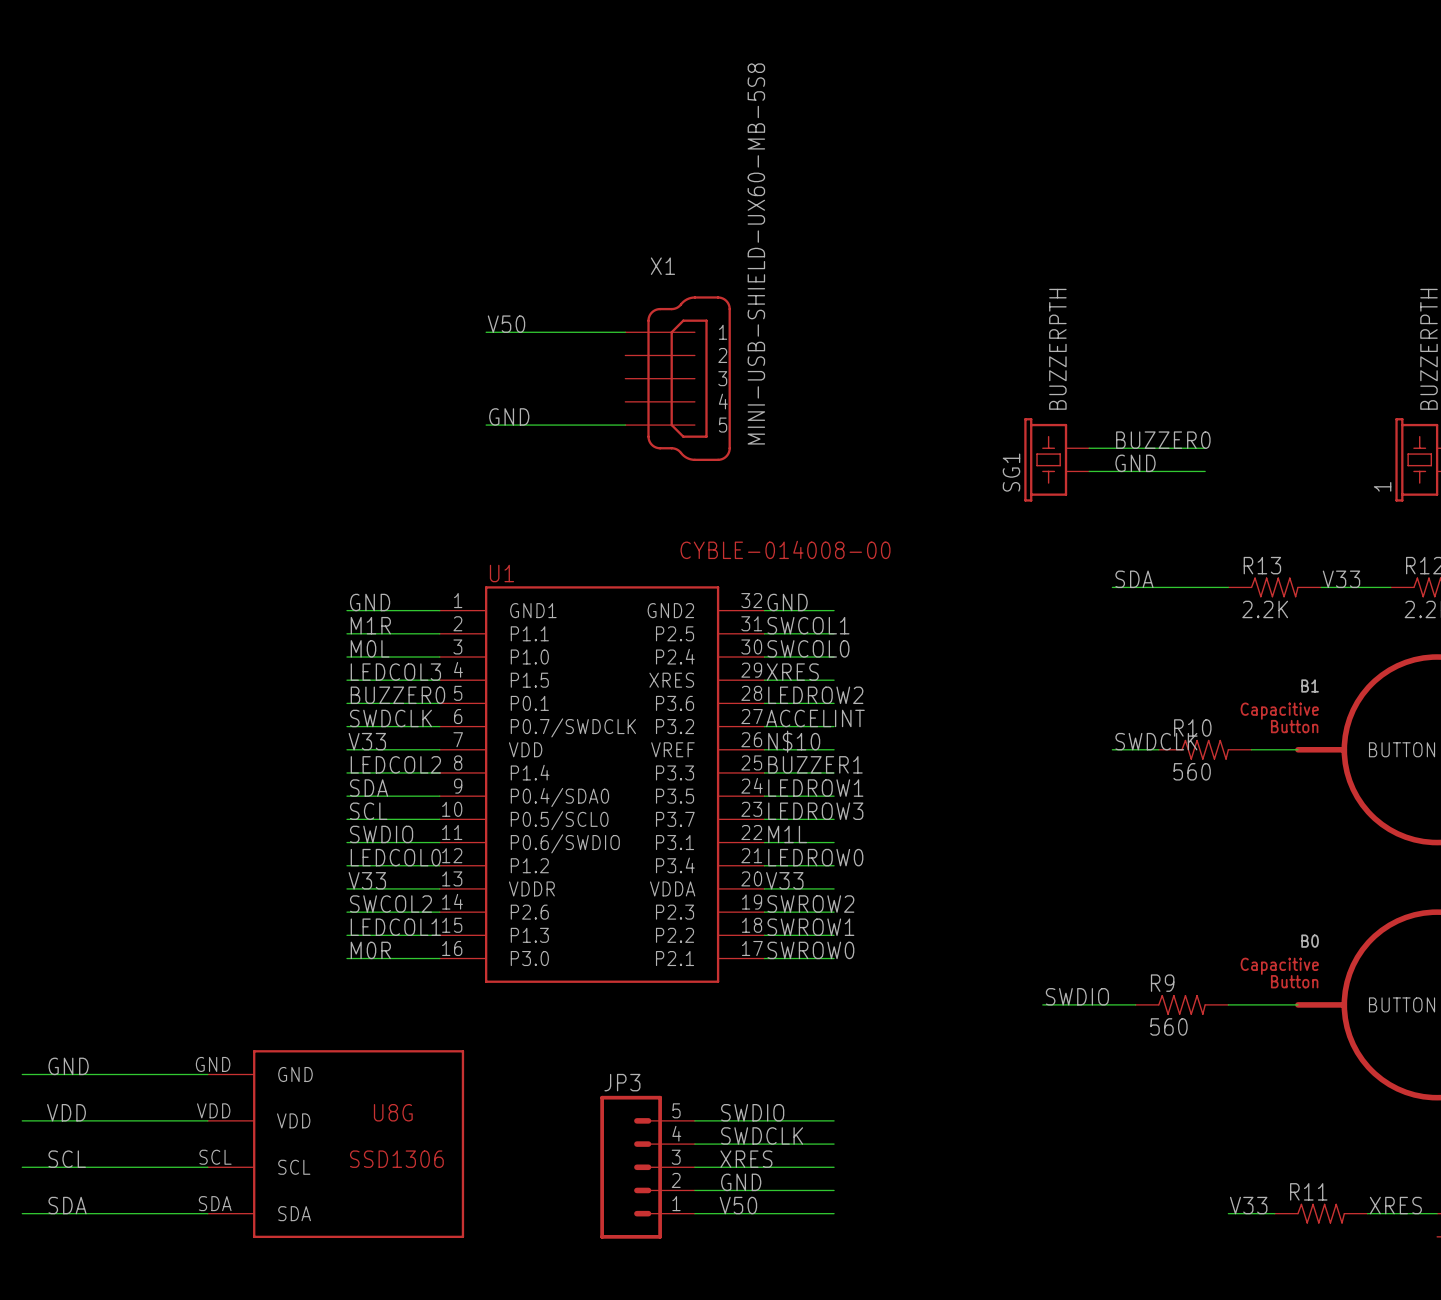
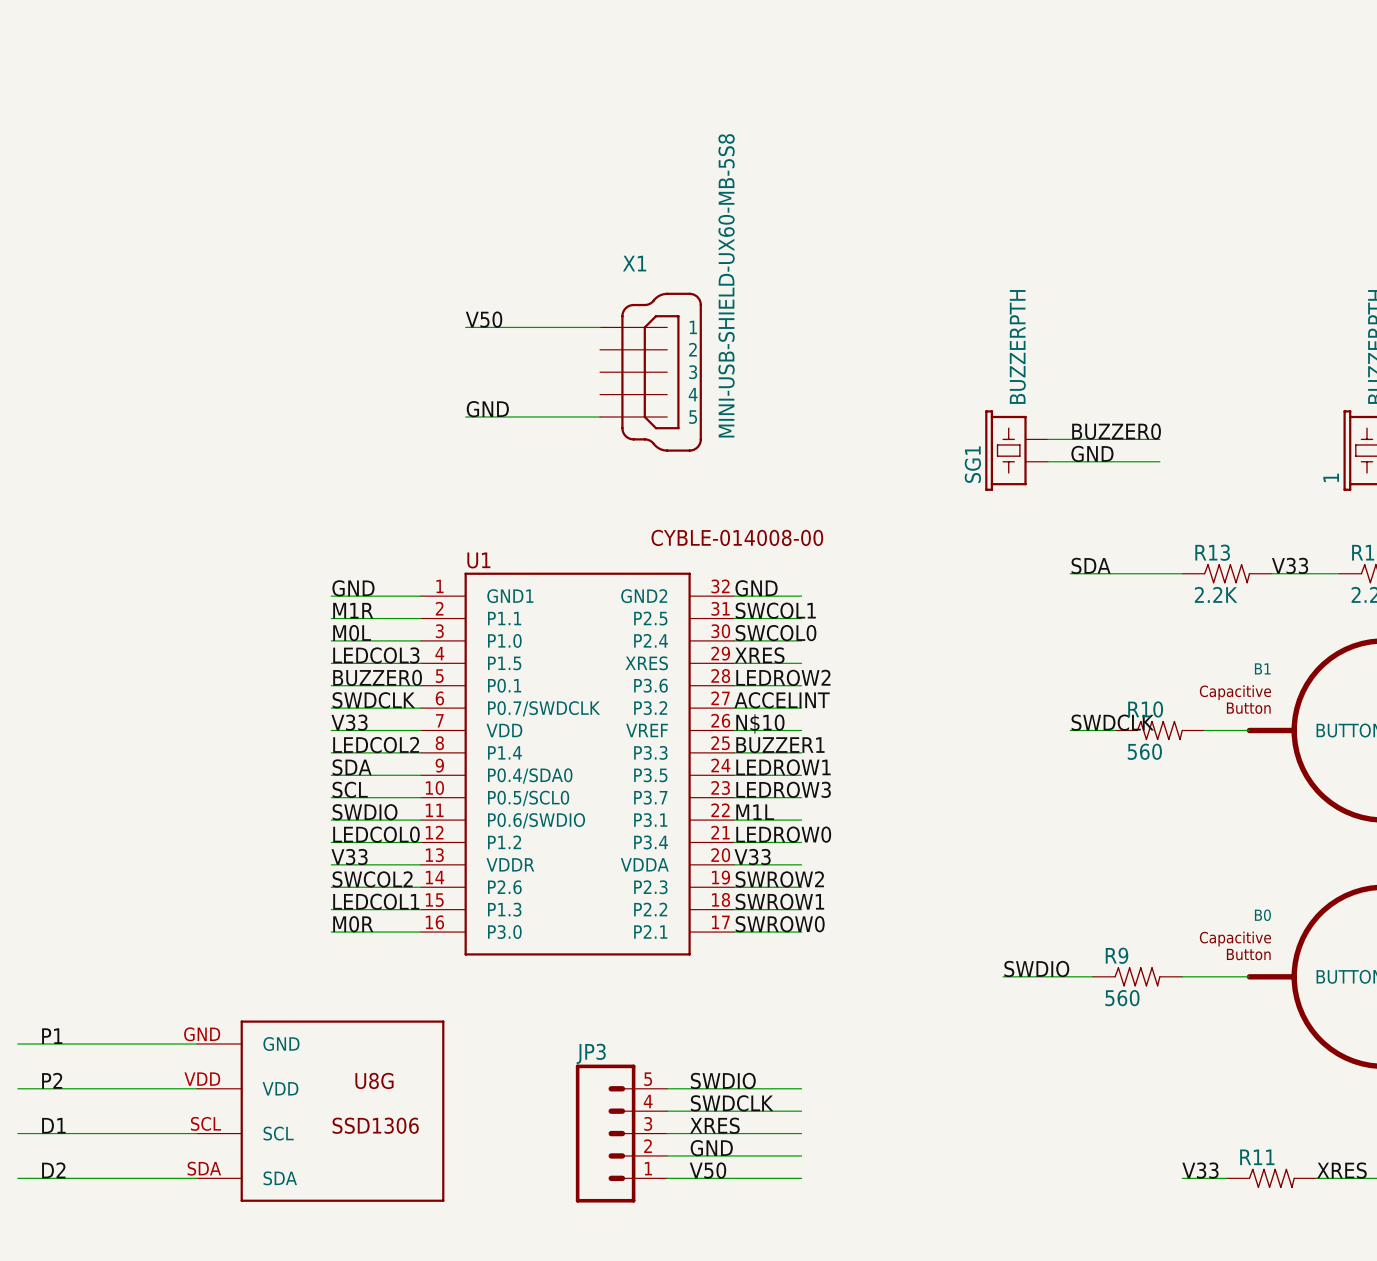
label: GND (68, 1066) -> P1 (52, 1036)
label: VDD (66, 1112) -> P2 (52, 1080)
label: SCL (67, 1159) -> D1 (53, 1125)
label: SDA (67, 1205) -> D2 (53, 1170)

